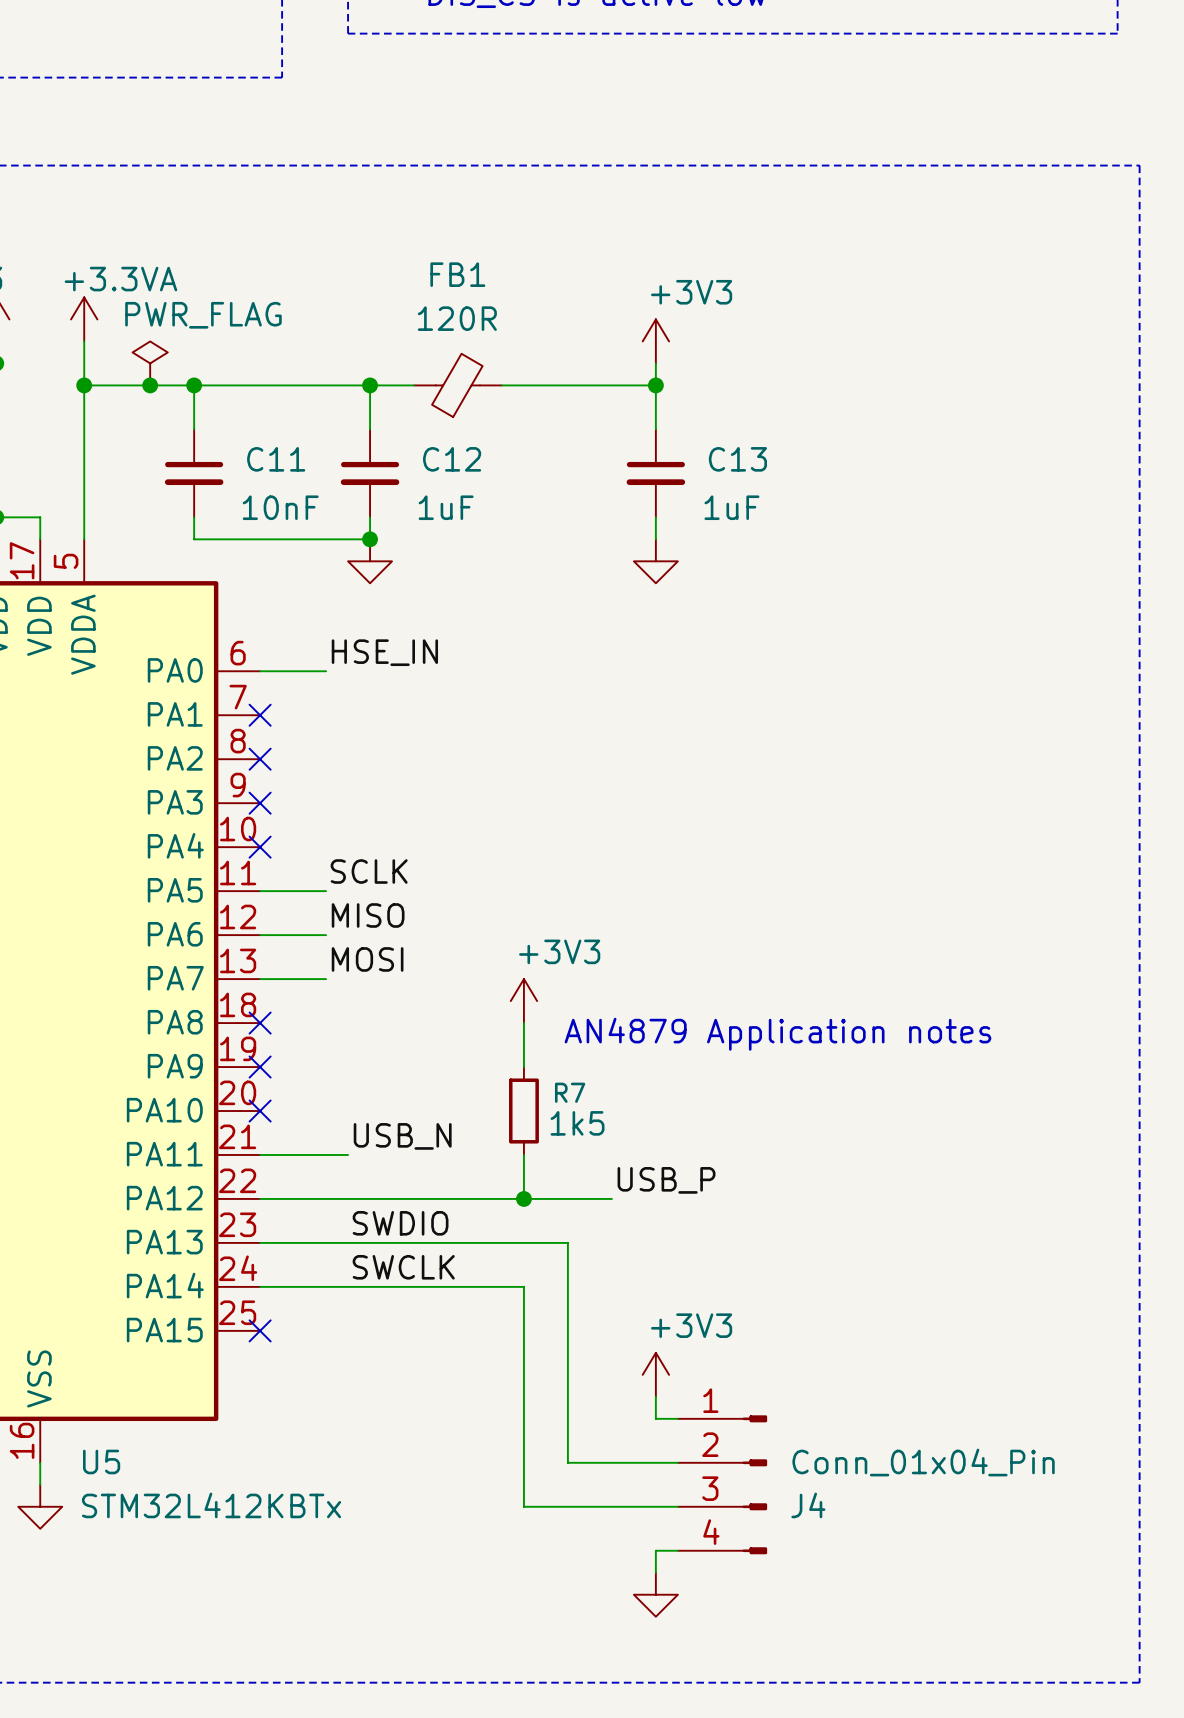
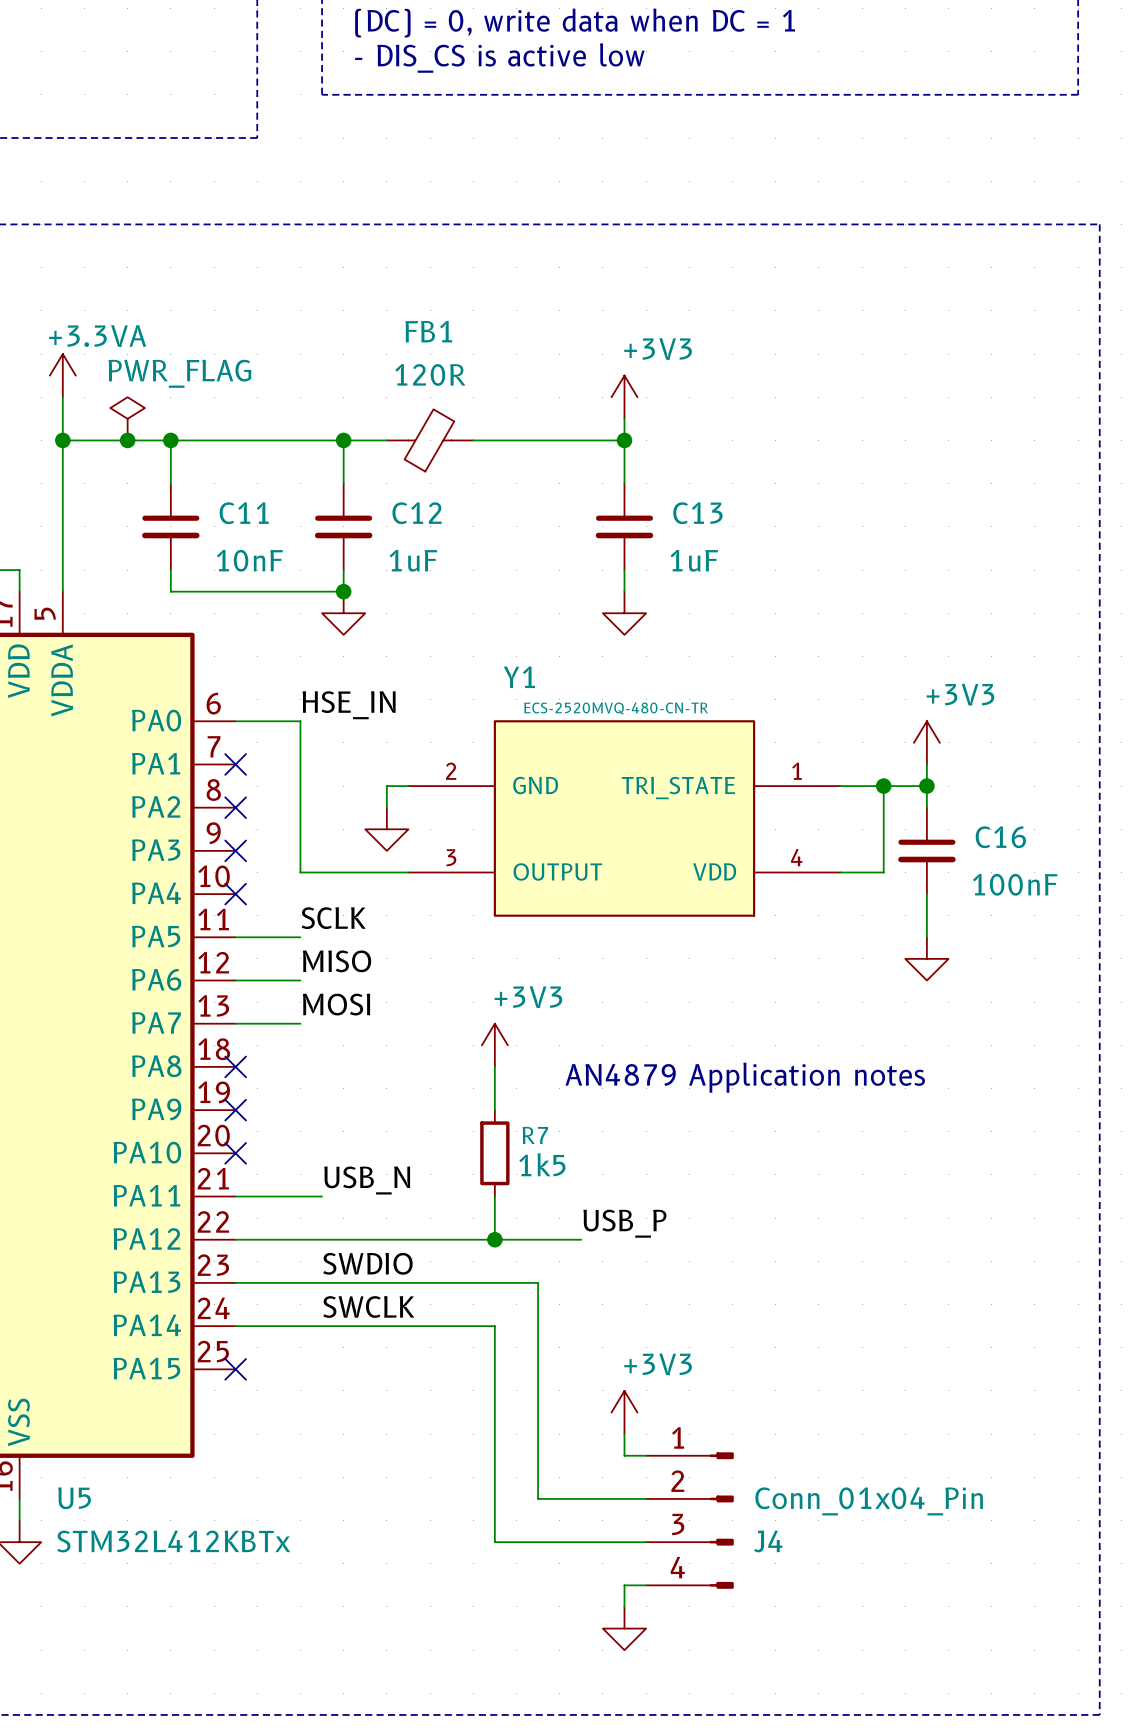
wire: none -> (300, 721) (300, 872) (408, 872)
power symbol: none -> +3V3 (926, 742)
wire: none -> (926, 764) (926, 807)
wire: none -> (408, 786) (386, 786) (386, 807)
wire: none -> (840, 786) (926, 786)
wire: none -> (883, 786) (883, 872) (840, 872)
junction: none -> (883, 786)
junction: none -> (926, 786)
Y1: none -> ECS-2520MVQ-480-CN-TR (624, 818)
power symbol: none -> (386, 829)
C16: none -> 100nF (926, 850)
wire: none -> (926, 894) (926, 937)
power symbol: none -> (926, 958)

